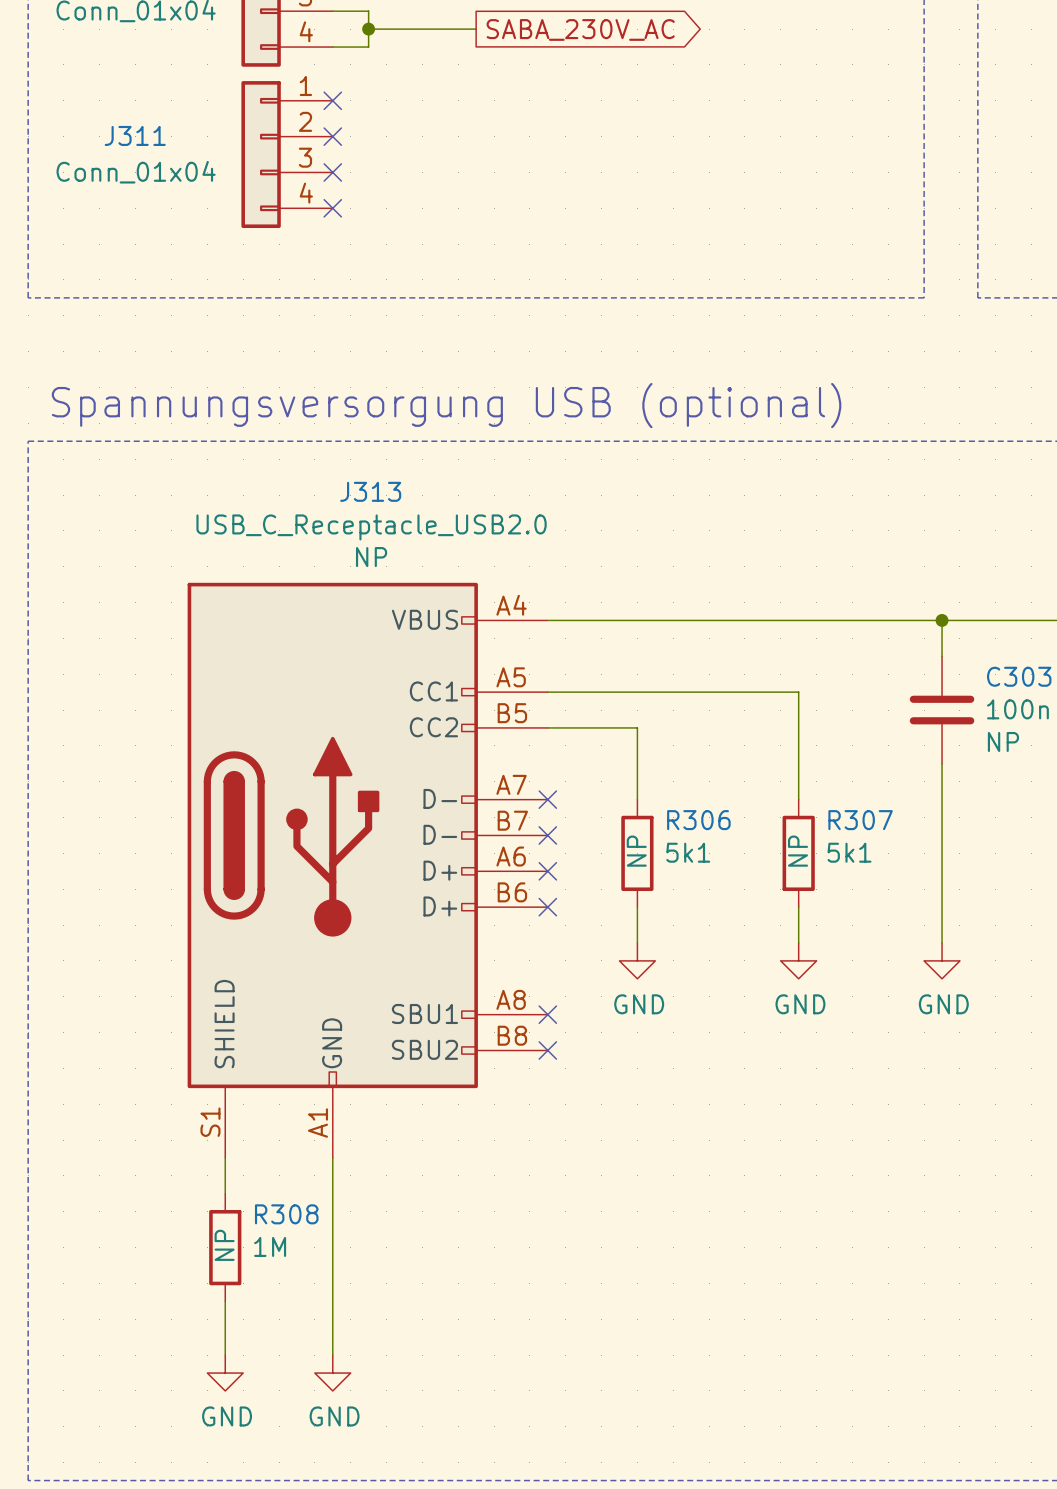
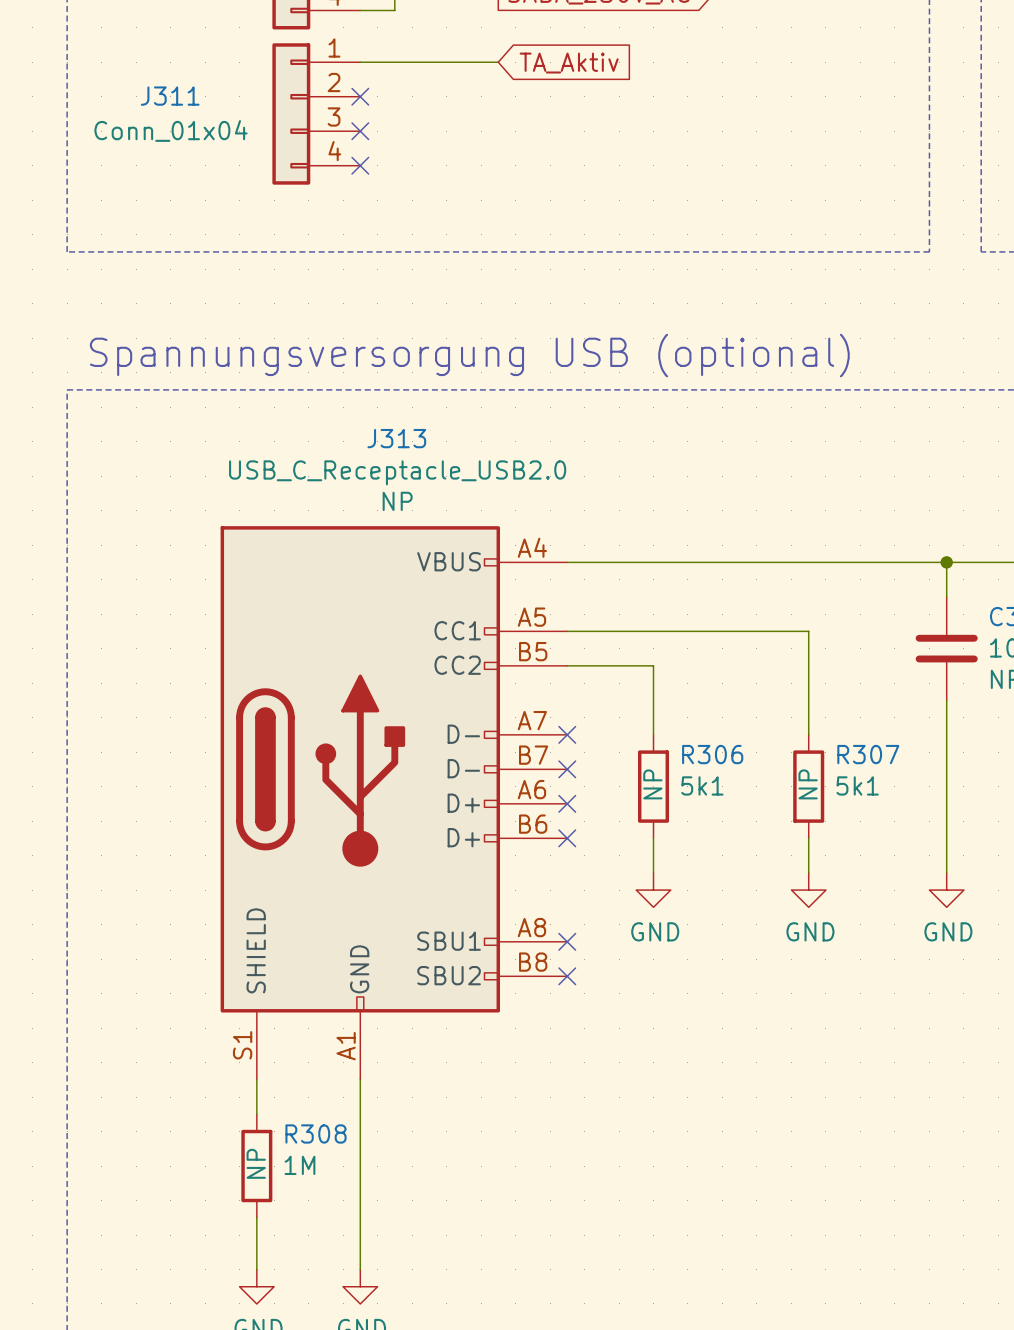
wire: none -> (360, 62) (498, 62)
no-connect mark: (332, 100) -> none
global label: none -> TA_Aktiv (569, 63)

